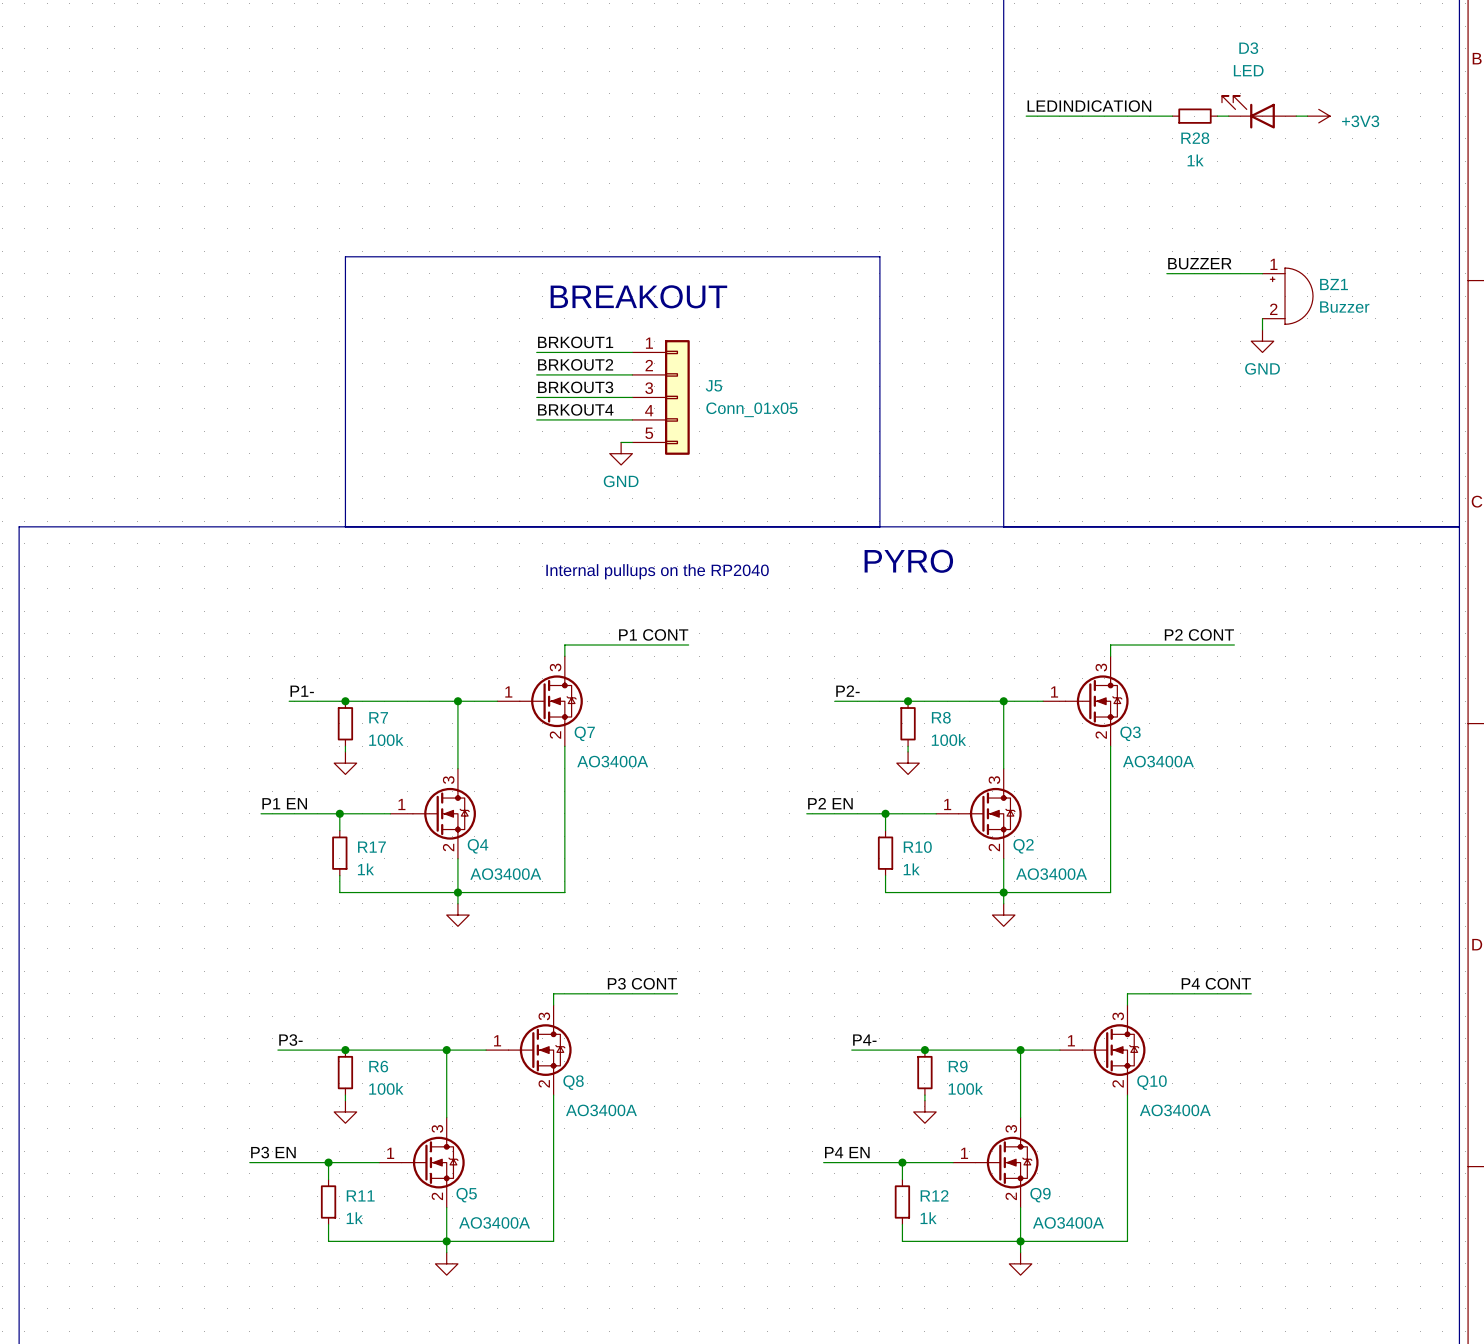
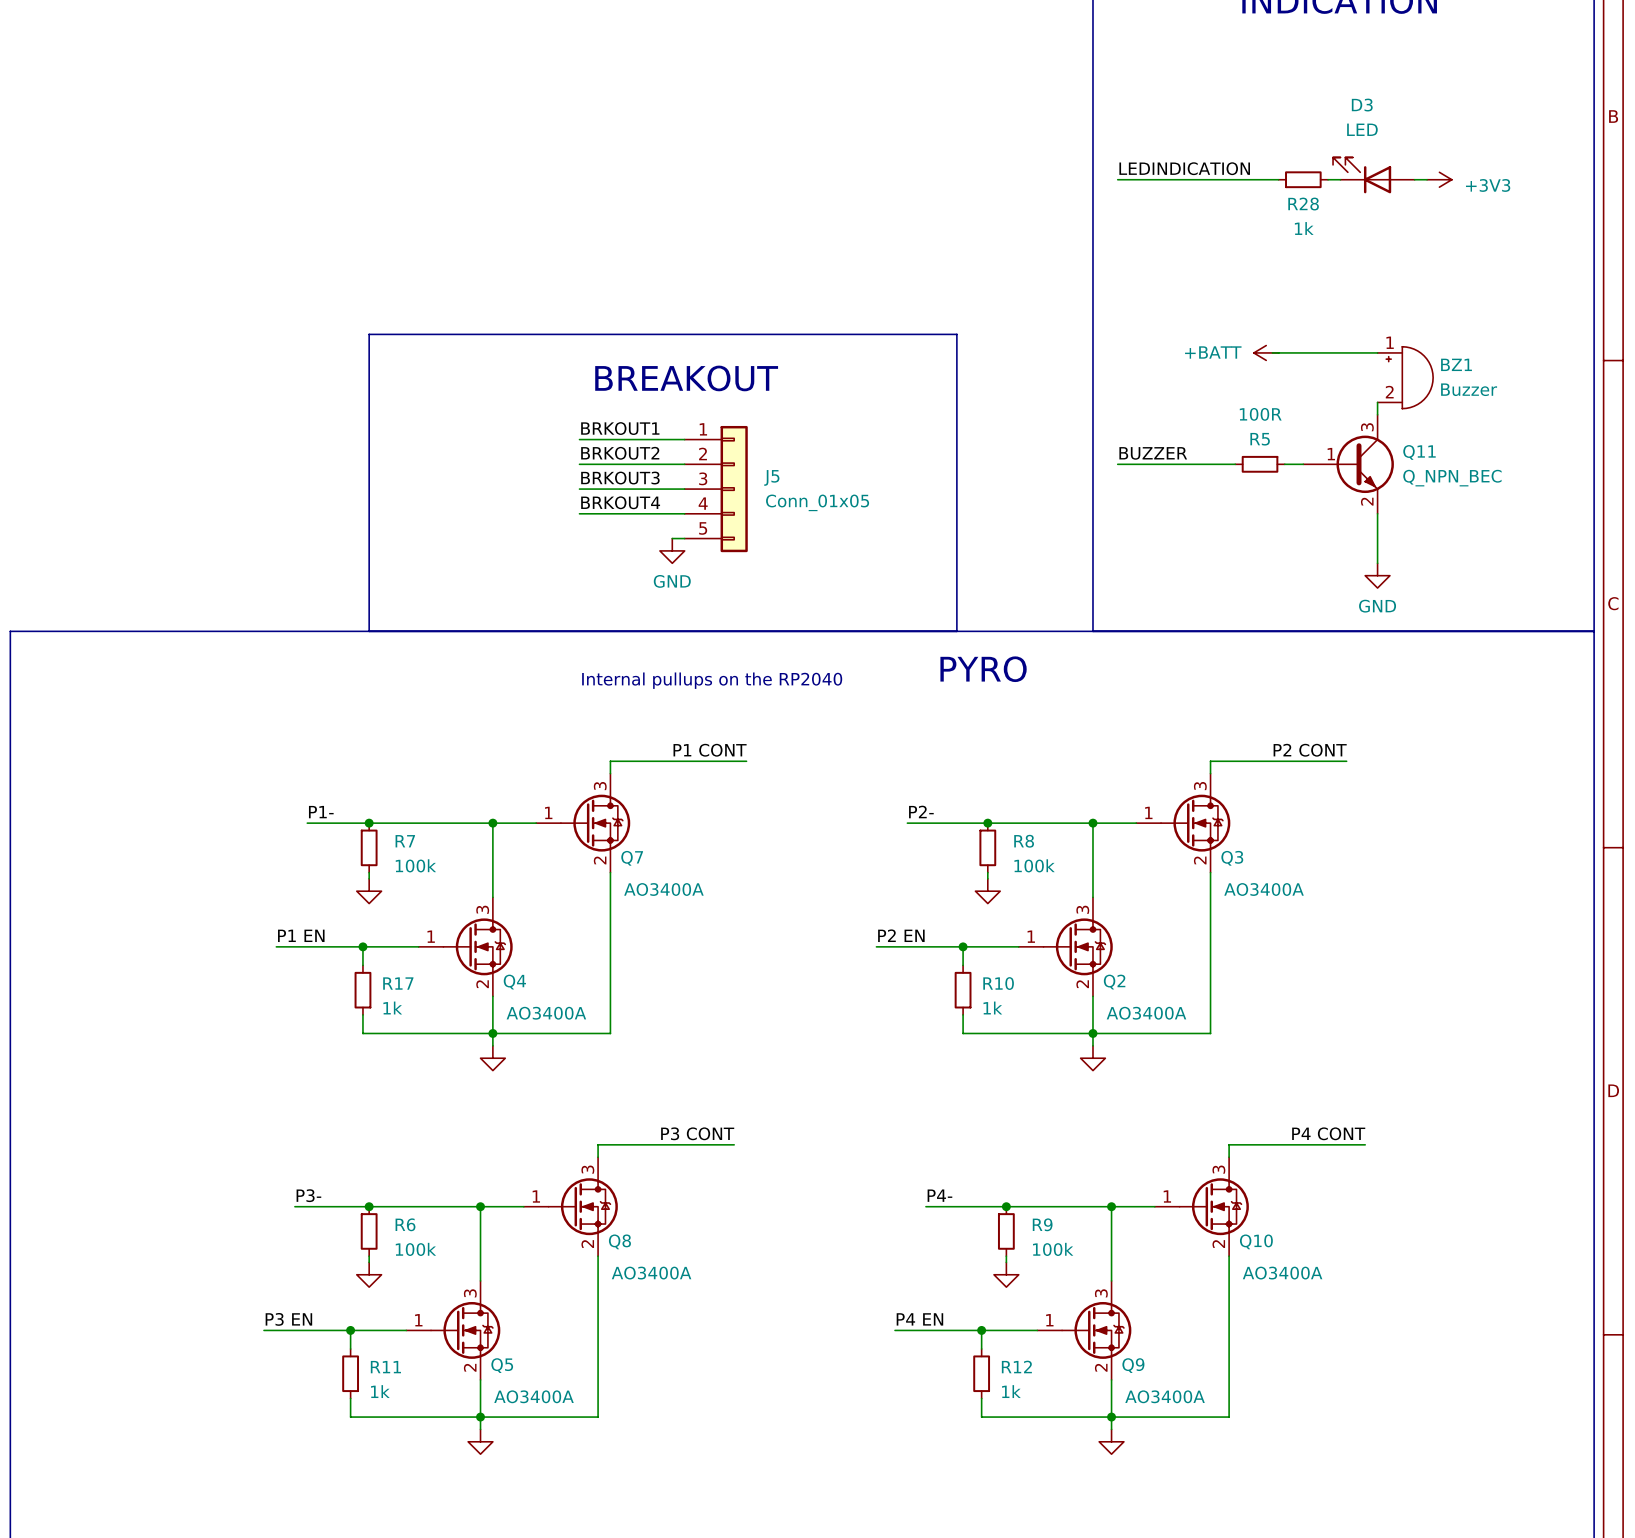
label position: BUZZER (1199, 263) -> BUZZER (1153, 453)
power symbol: none -> +BATT (1266, 352)
power symbol position: GND (1262, 341) -> GND (1377, 575)
wire: none -> (1117, 464) (1235, 464)
R5: none -> 100R (1260, 464)
wire: none -> (1284, 464) (1303, 464)
Q11: none -> Q_NPN_BEC (1348, 464)
wire: none -> (1377, 513) (1377, 563)

